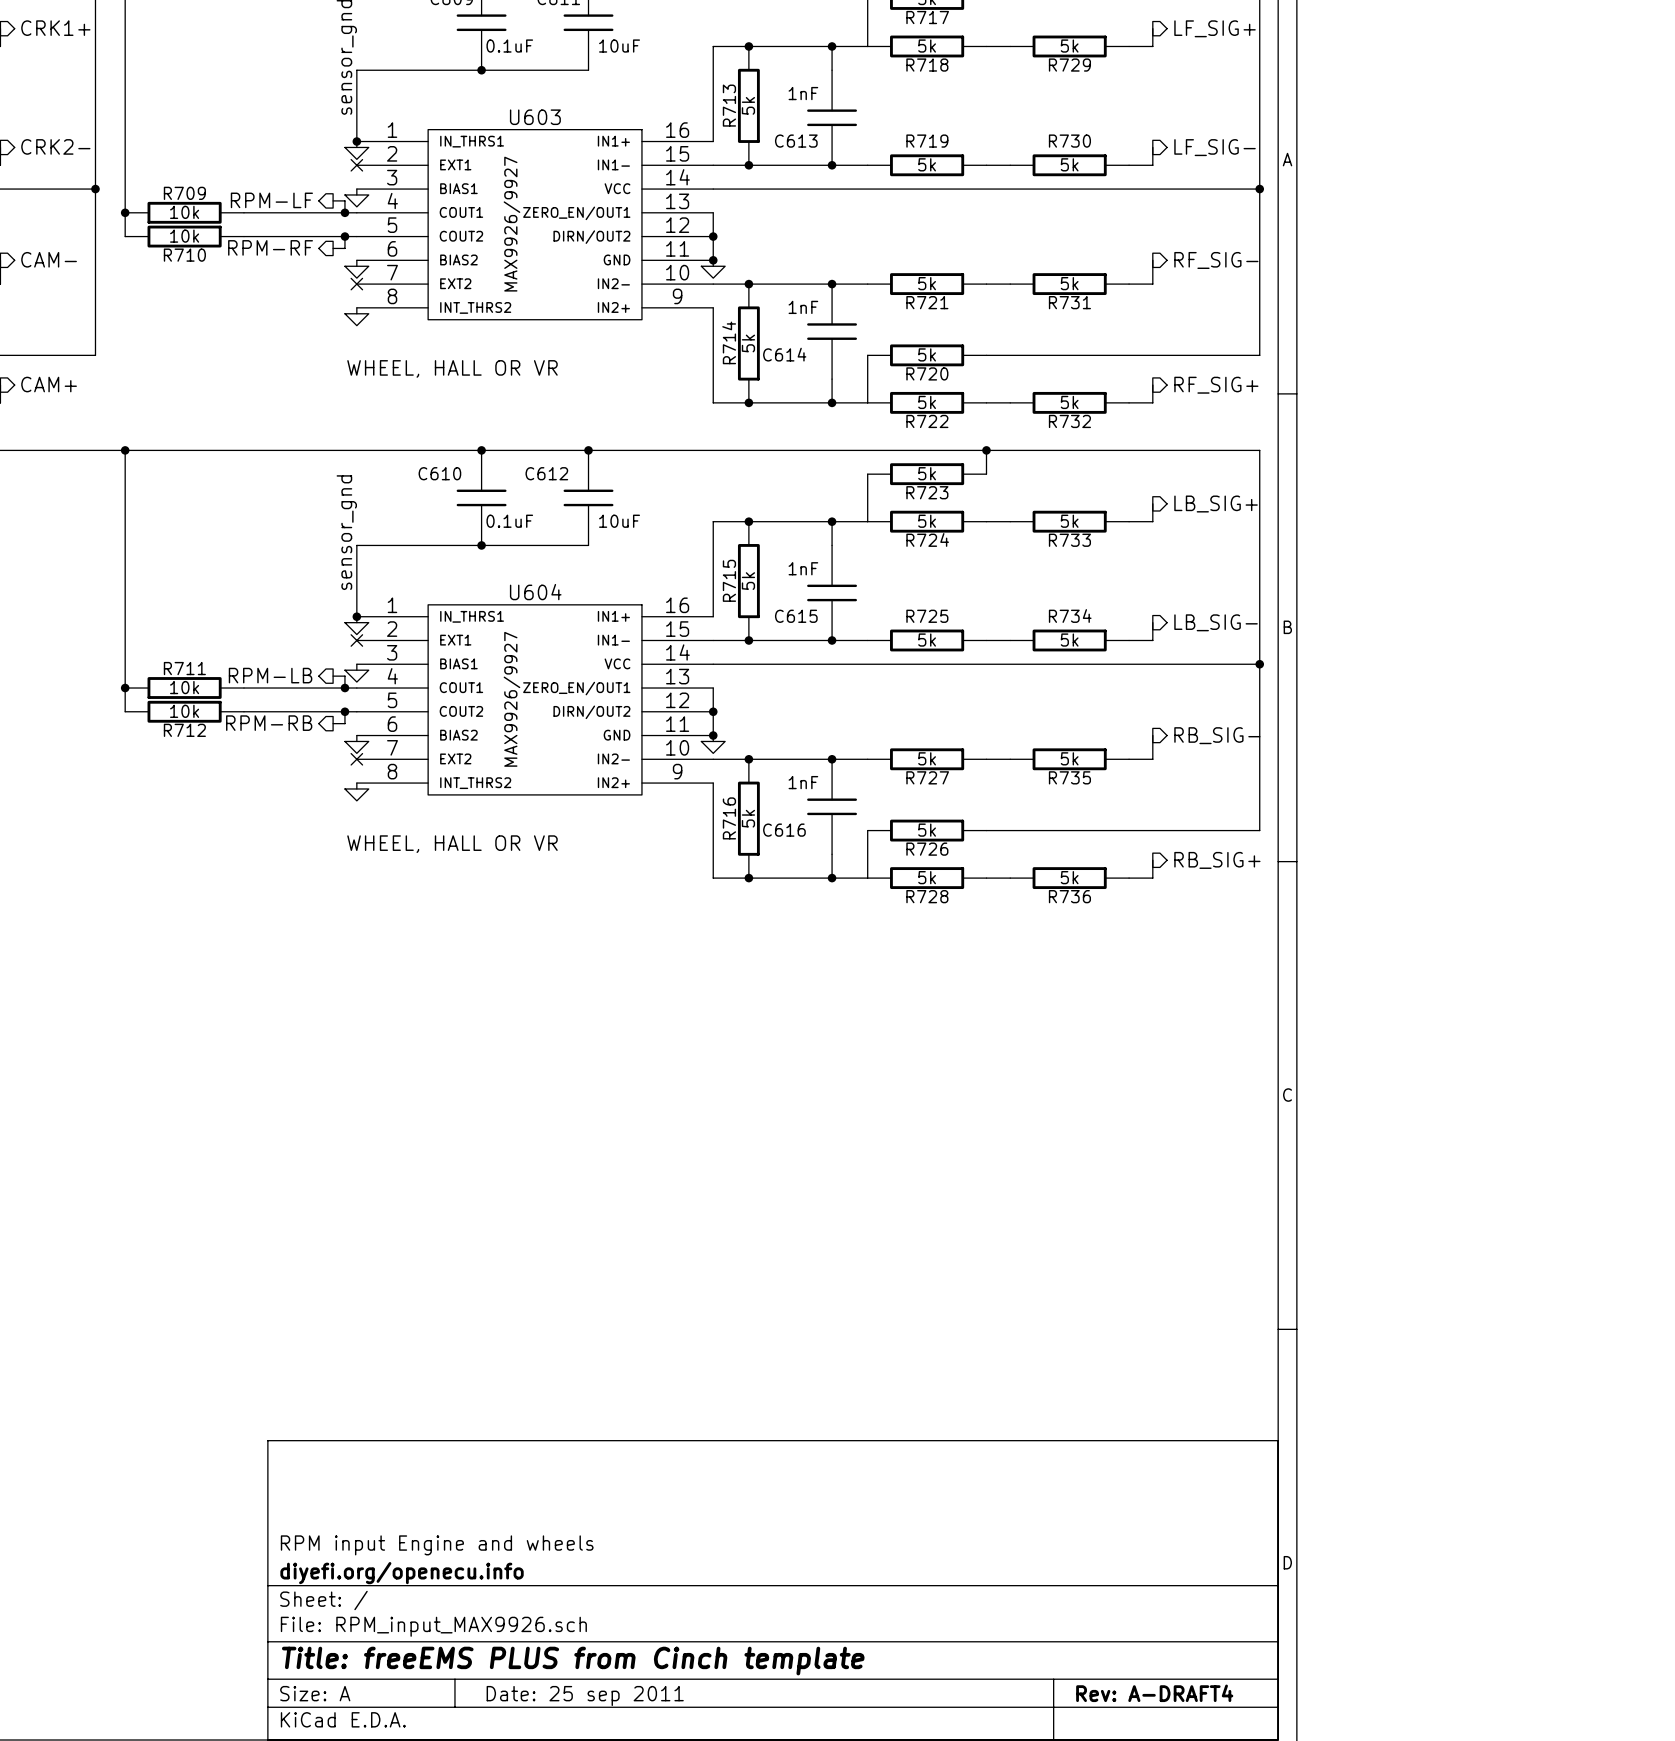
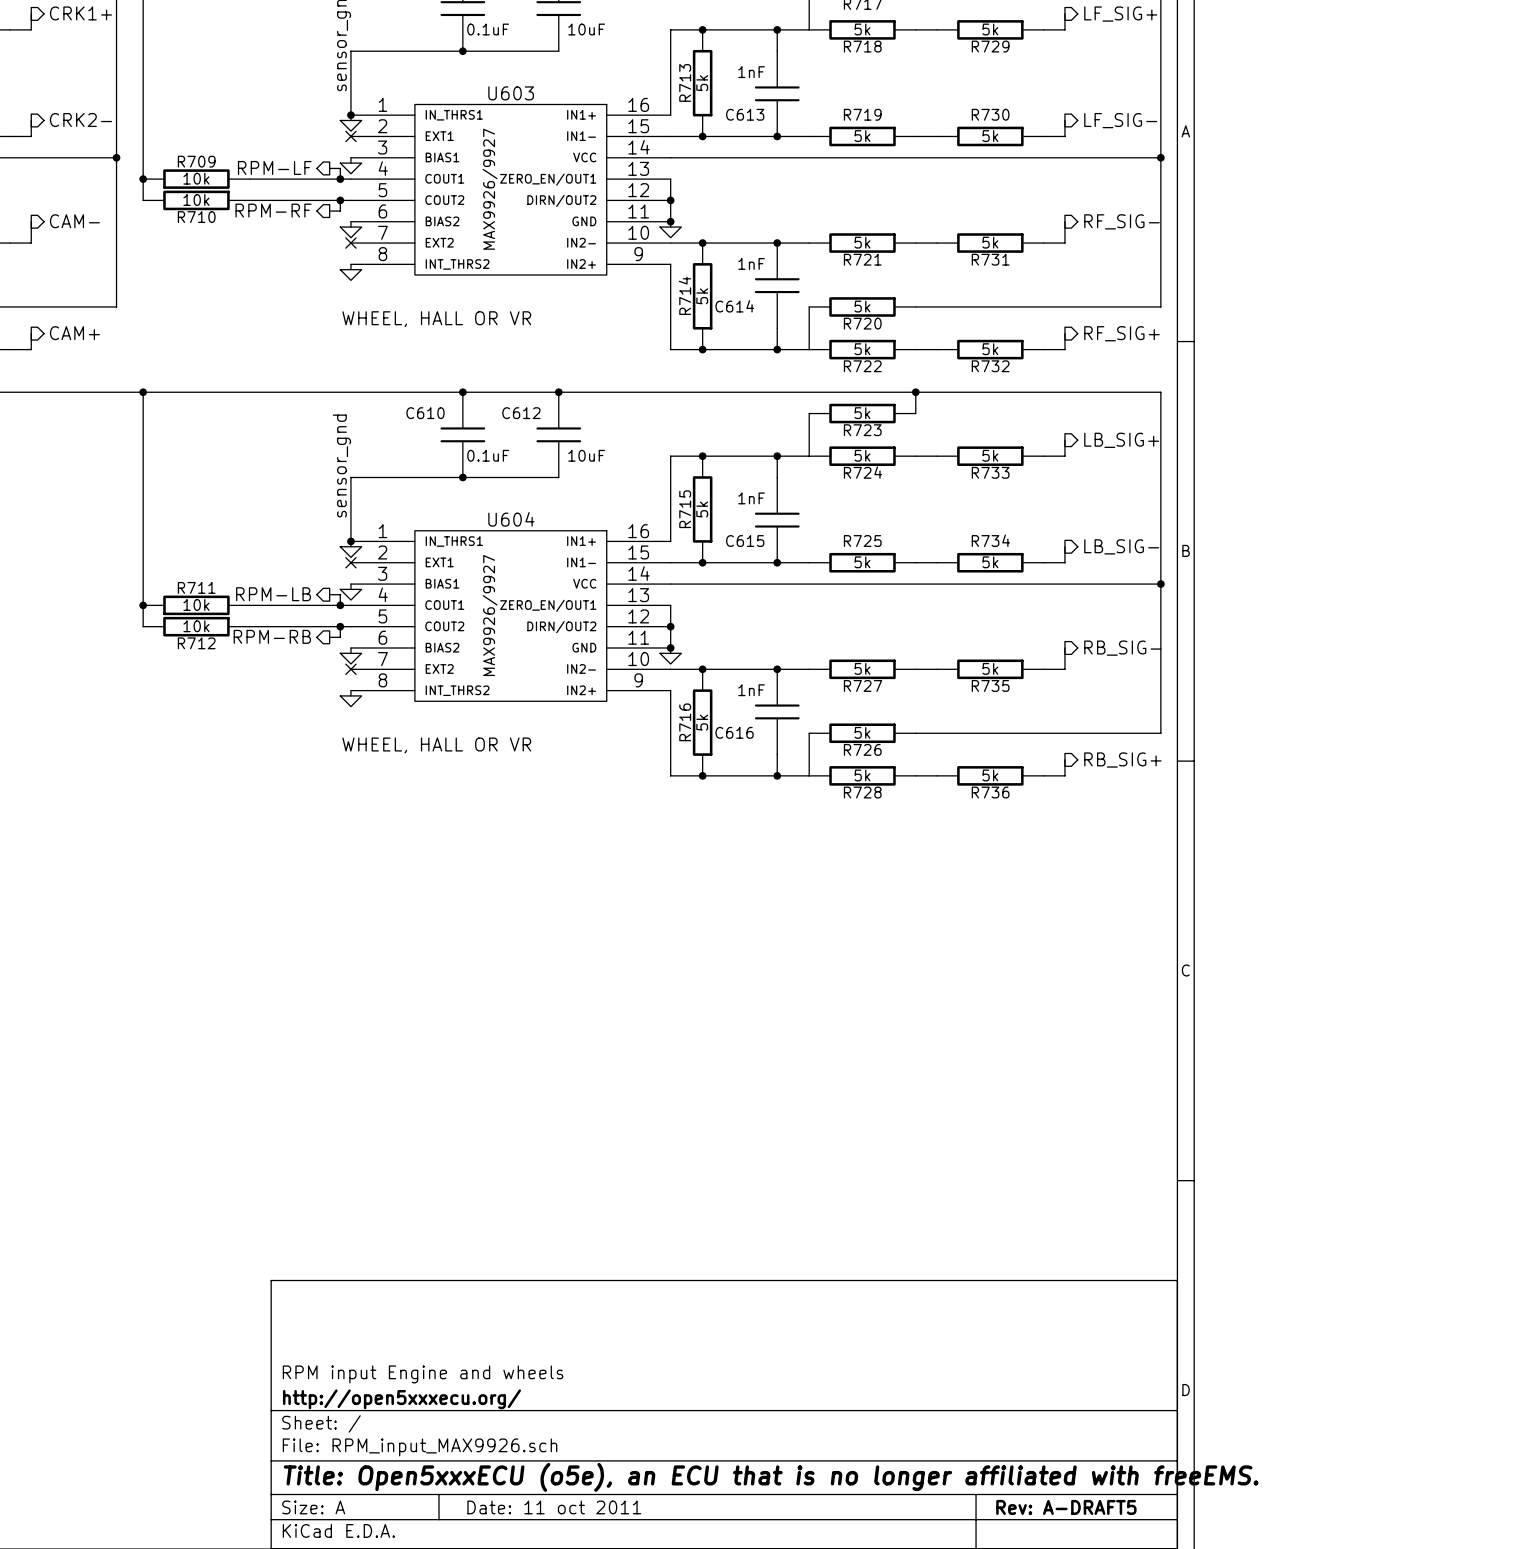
title block: diyefi.org/openecu.info (402, 1573) -> http://open5xxxecu.org/ (401, 1399)
title block: Title: freeEMS PLUS from Cinch template (573, 1661) -> Title: Open5xxxECU (o5e), an ECU that is no longer affiliated with freeEMS. (771, 1477)
title block: Rev: A-DRAFT4 (1154, 1693) -> Rev: A-DRAFT5 (1066, 1507)
title block: Date: 25 sep 2011 (585, 1695) -> Date: 11 oct 2011 (554, 1507)

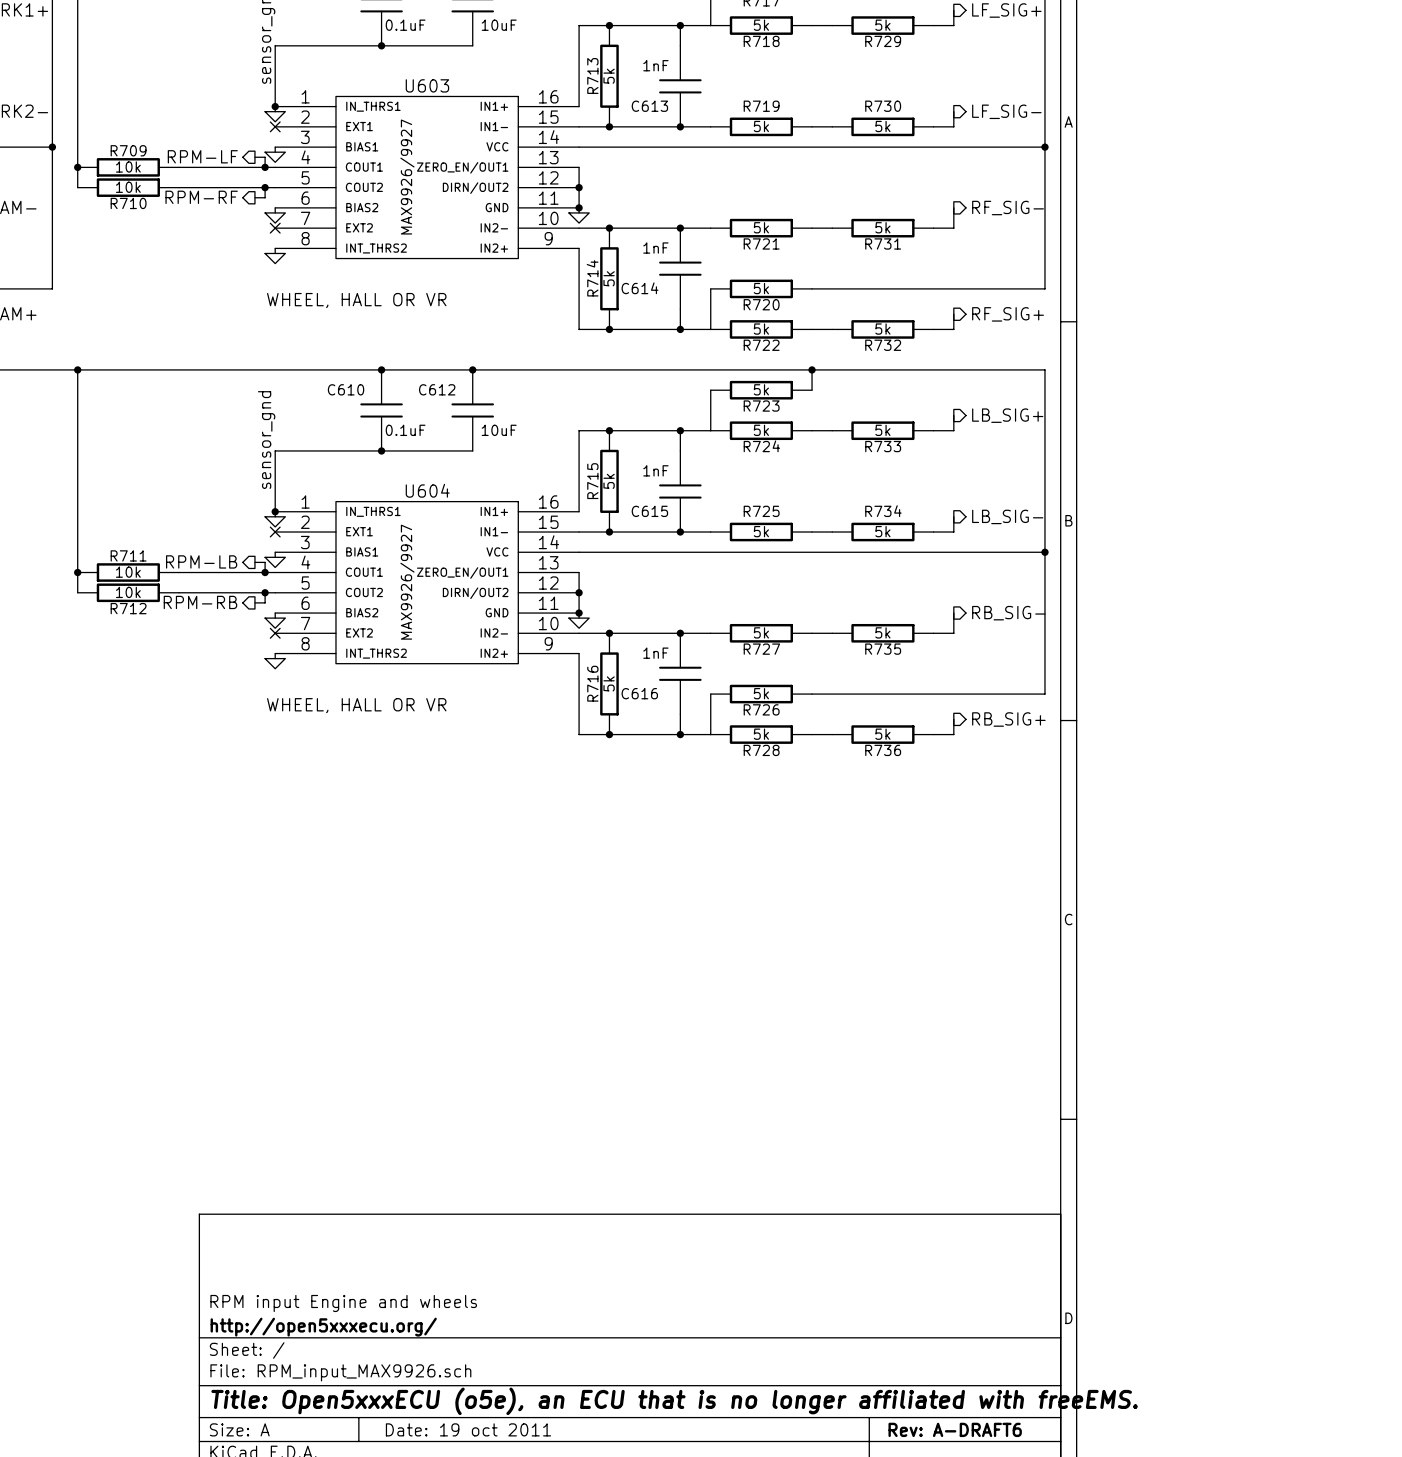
title block: Date: 11 oct 2011 (554, 1507) -> Date: 19 oct 2011 (468, 1429)
title block: Rev: A-DRAFT5 (1066, 1507) -> Rev: A-DRAFT6 (955, 1429)

